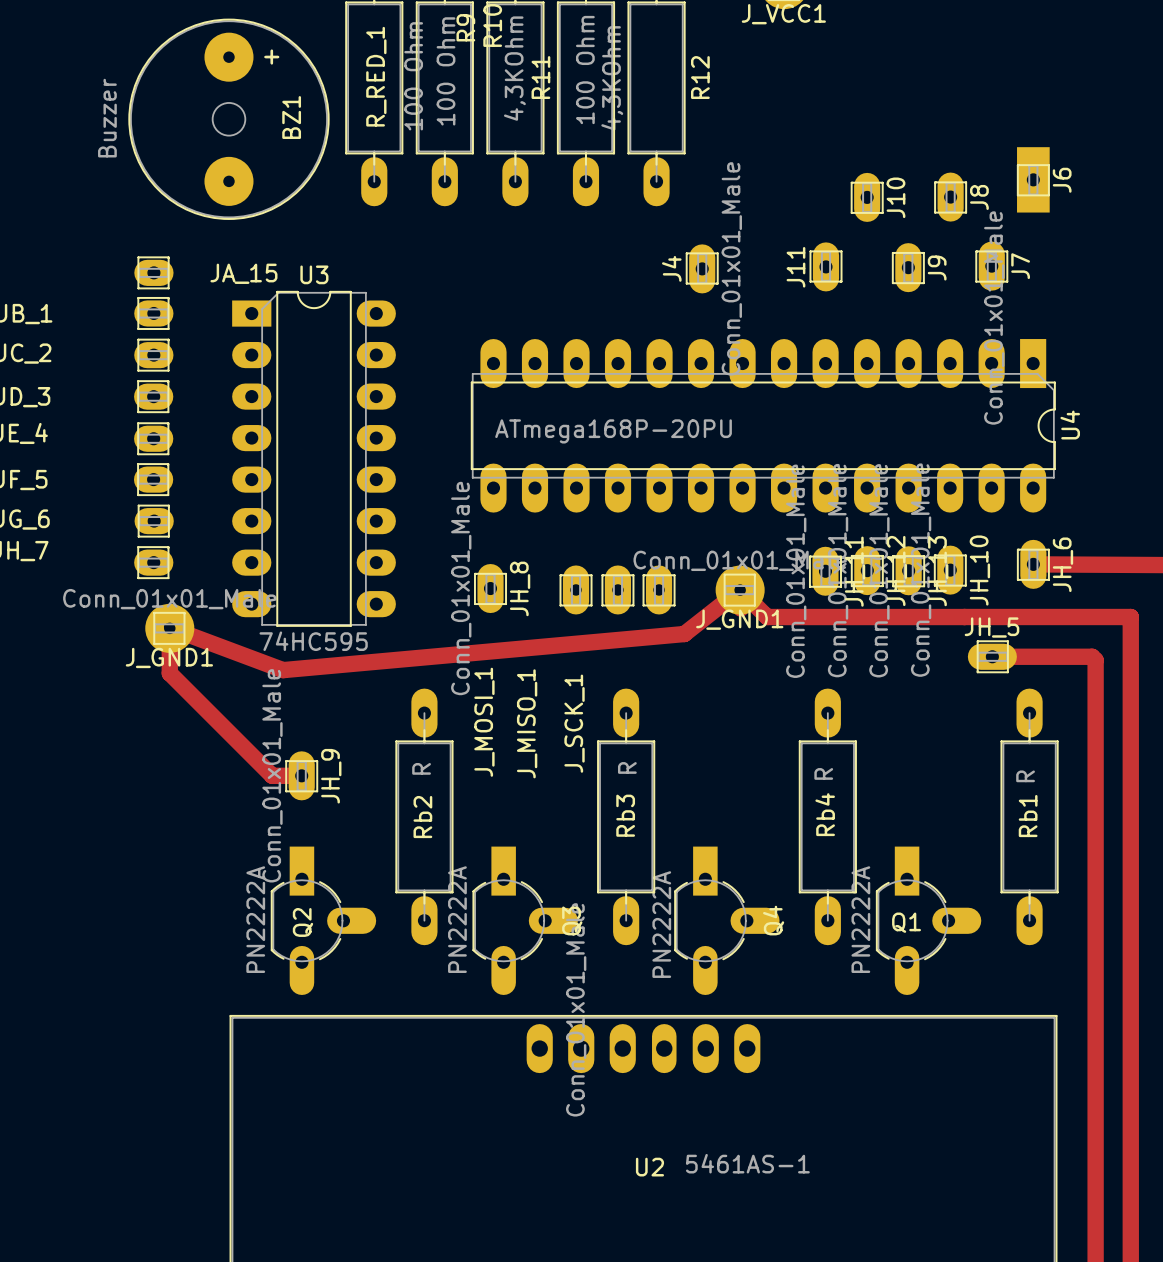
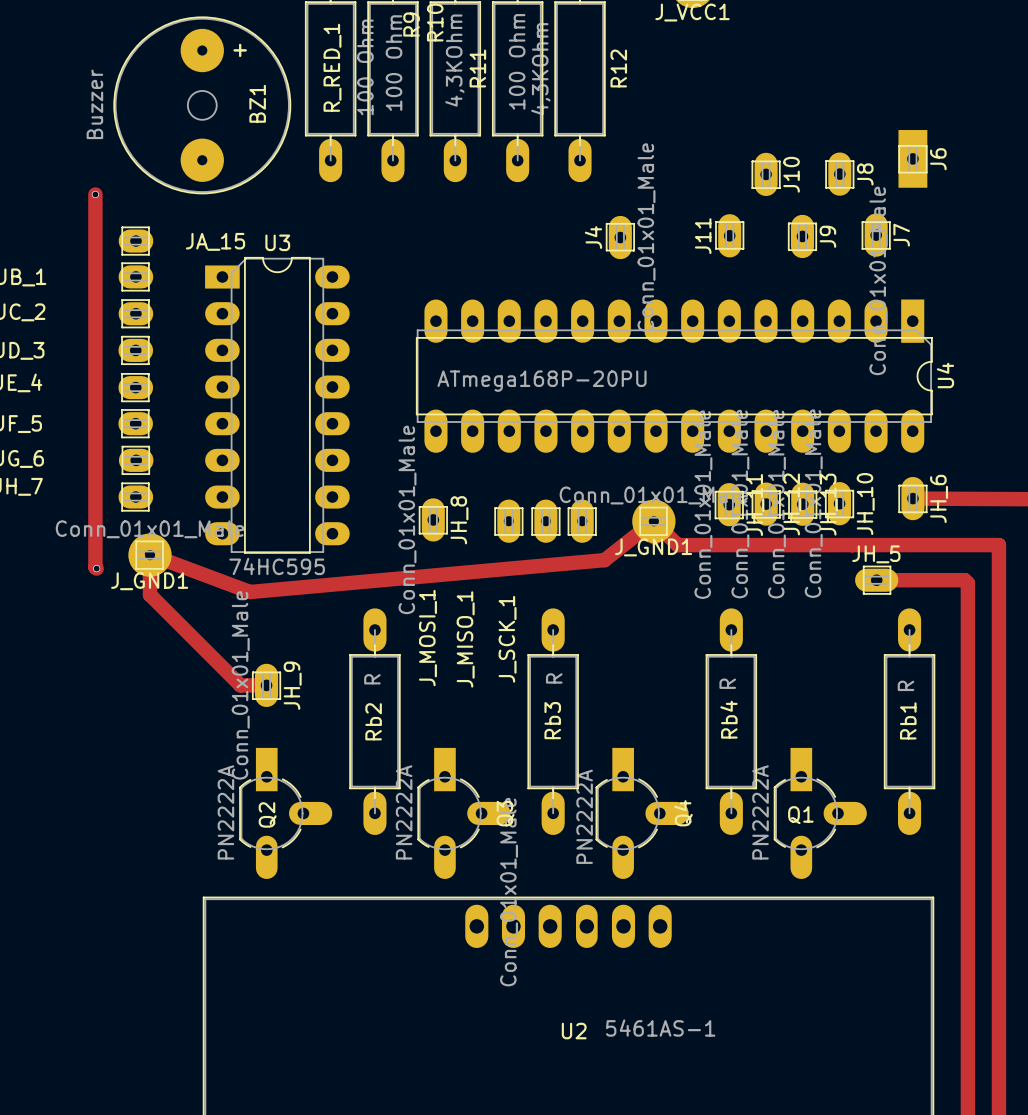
track: none -> (95, 194) (96, 568)
via: none -> (95, 194)
via: none -> (96, 568)

